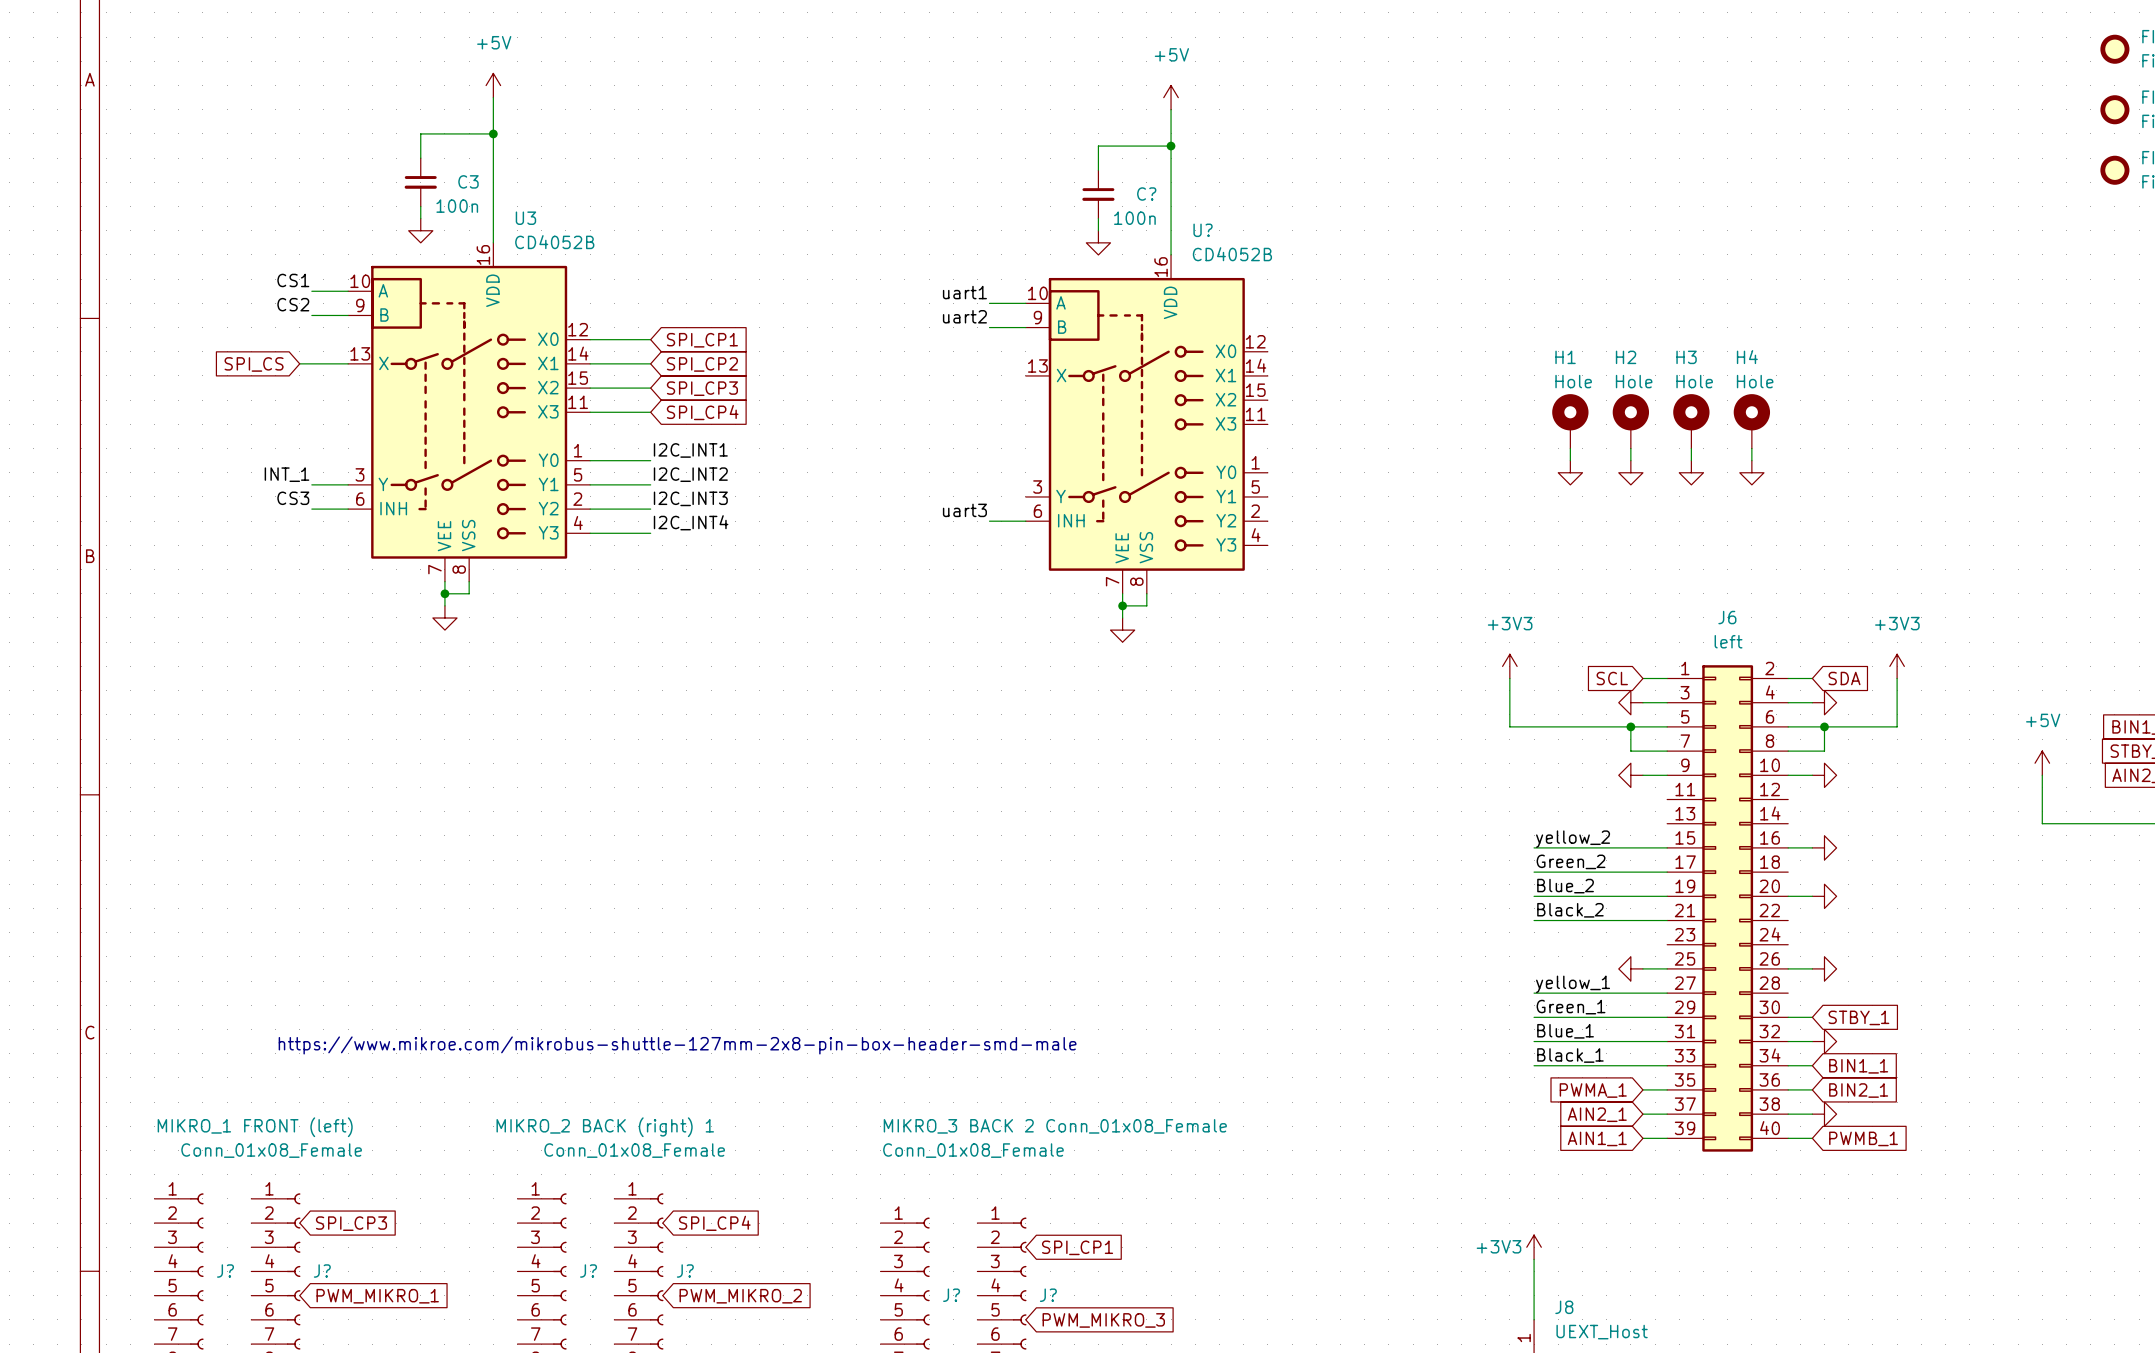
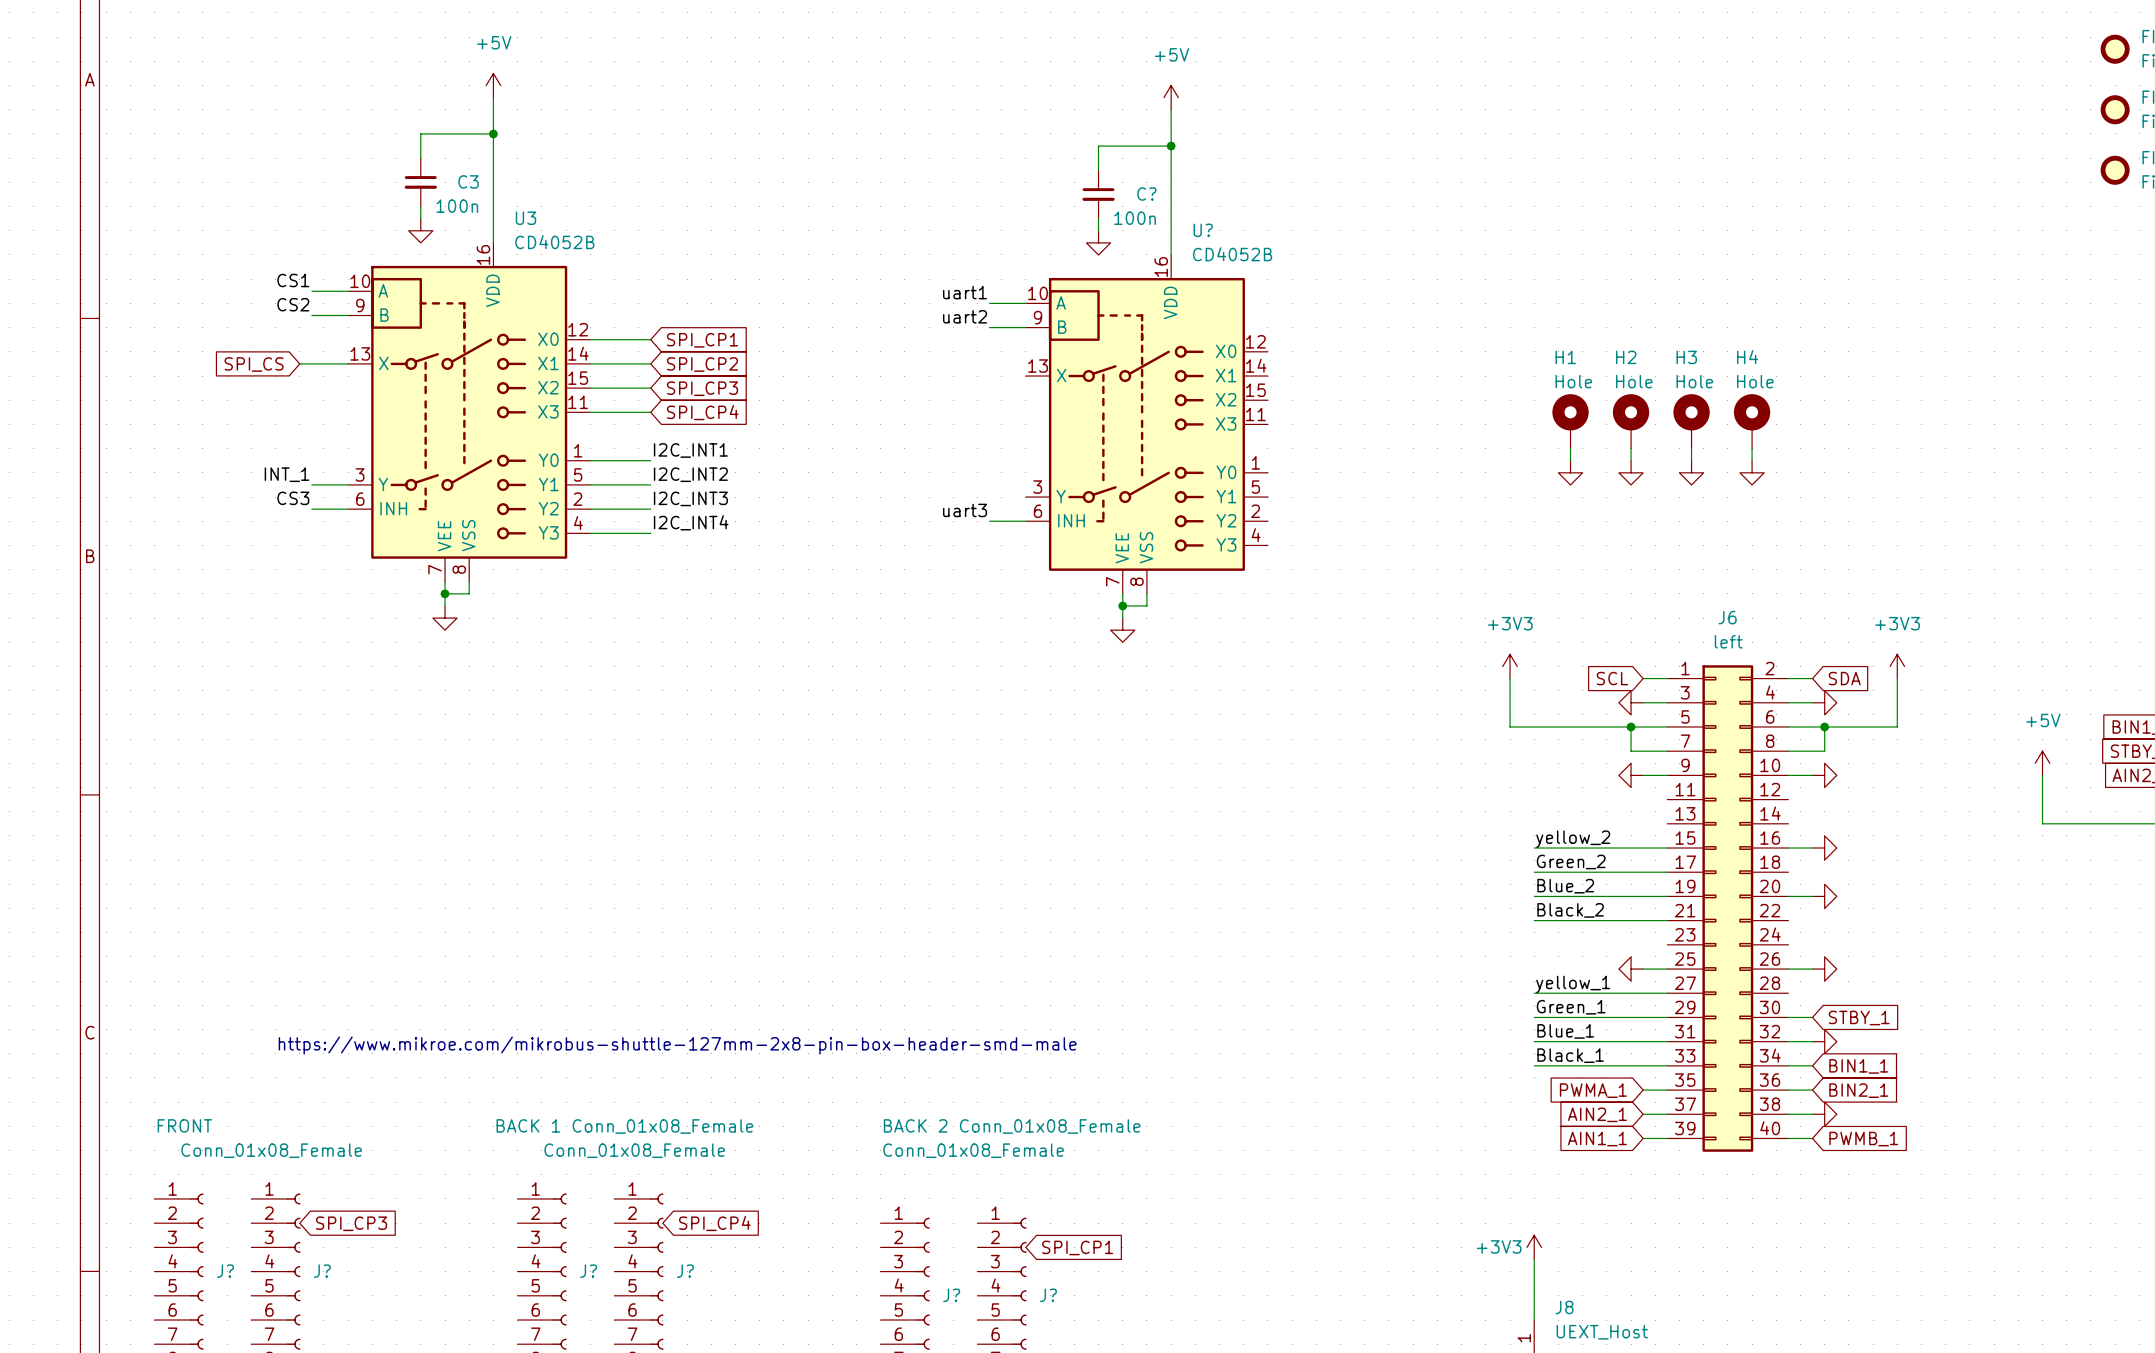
J? value: MIKRO_3 BACK 2 Conn_01x08_Female (1055, 1126) -> BACK 2 Conn_01x08_Female (1012, 1126)
J? value: MIKRO_1 FRONT (left) (255, 1127) -> FRONT (184, 1125)
J? value: MIKRO_2 BACK (right) 1 (605, 1127) -> BACK 1 Conn_01x08_Female (624, 1126)
global label: PWM_MIKRO_1 (377, 1296) -> none
global label: PWM_MIKRO_2 (740, 1296) -> none
global label: PWM_MIKRO_3 (1103, 1320) -> none

